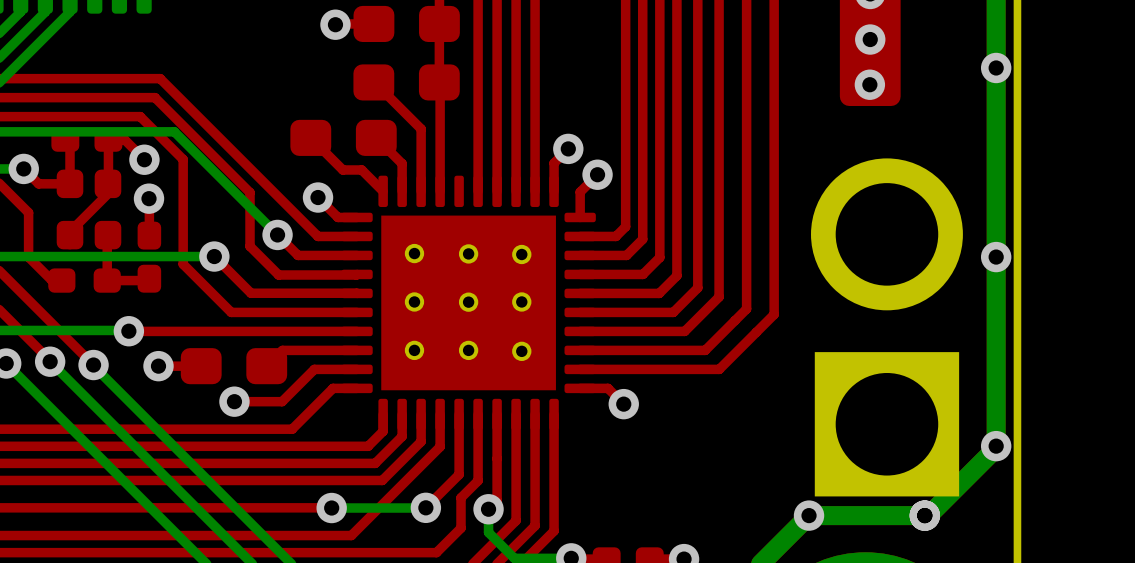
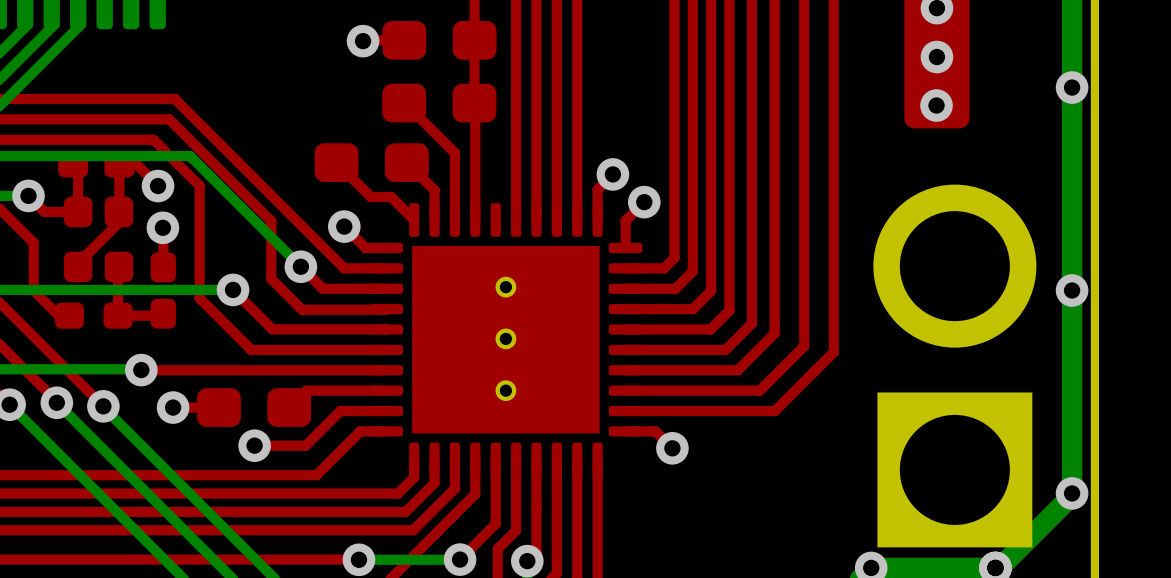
part footprint: [341, 175, 596, 431] -> [369, 203, 643, 477]

